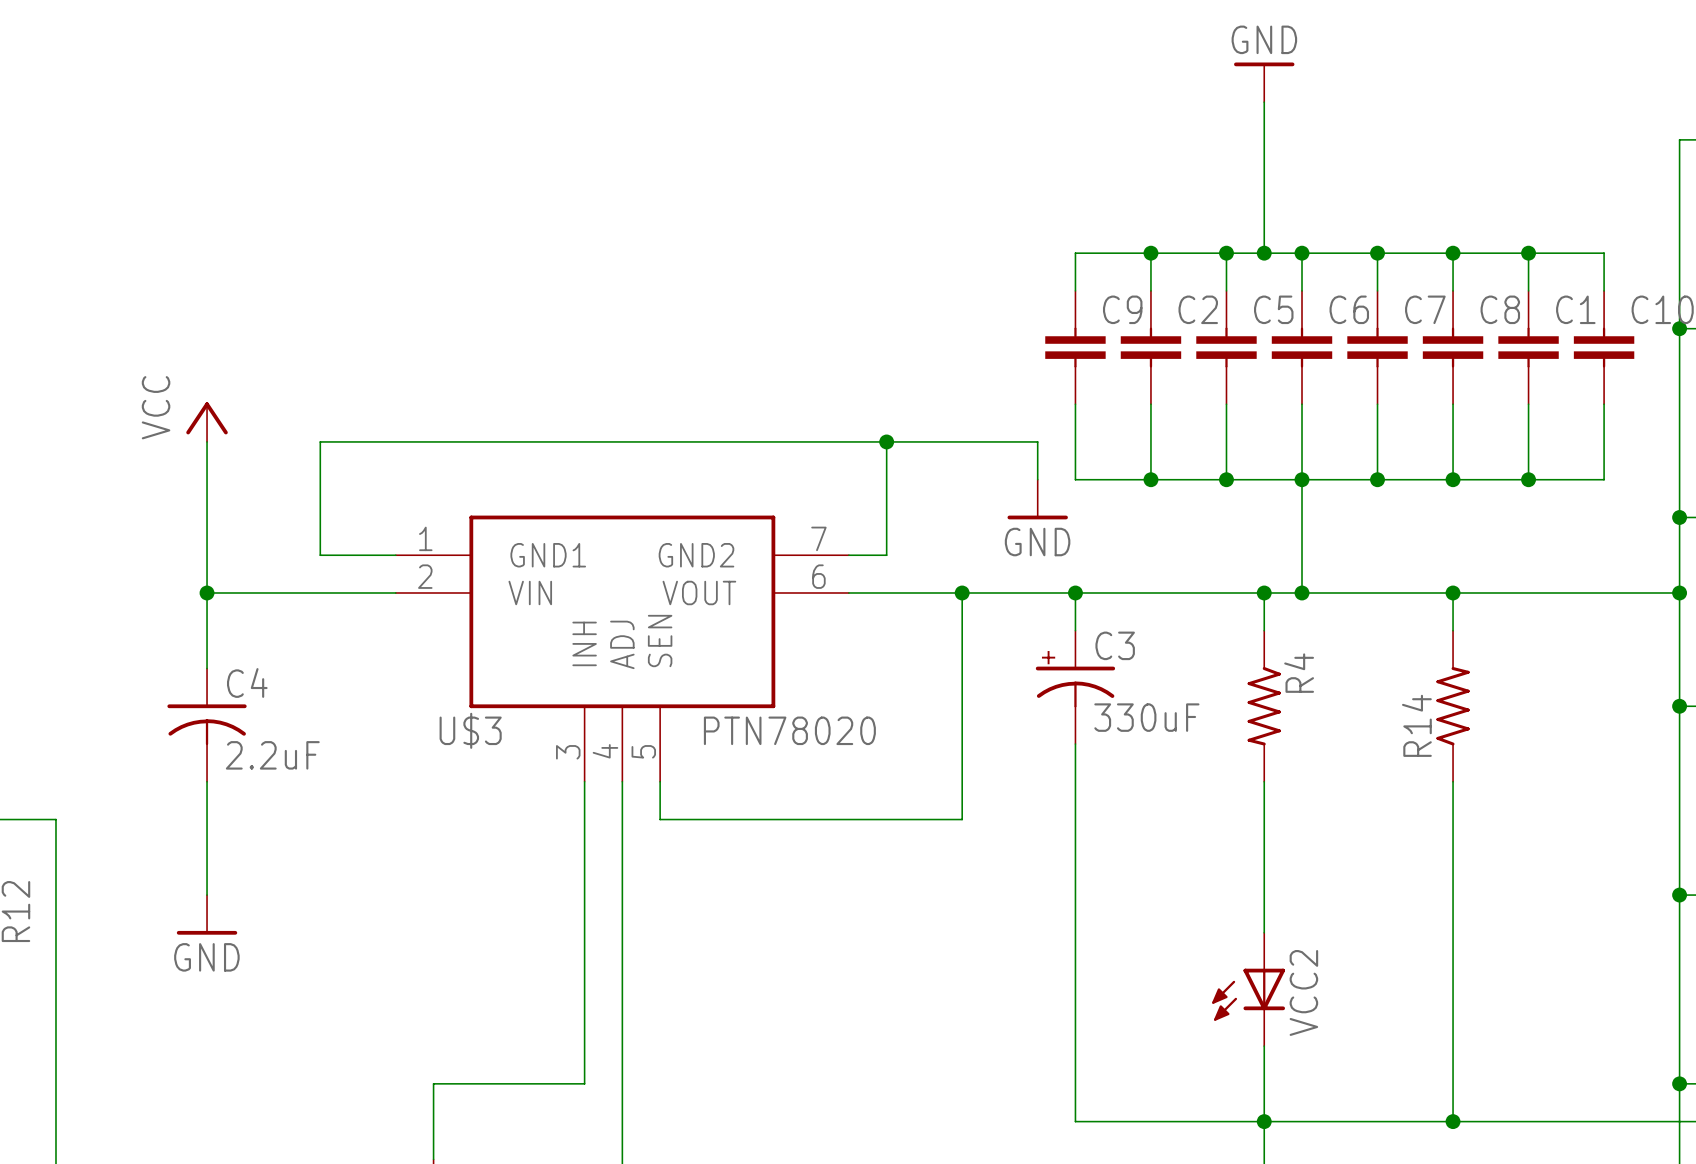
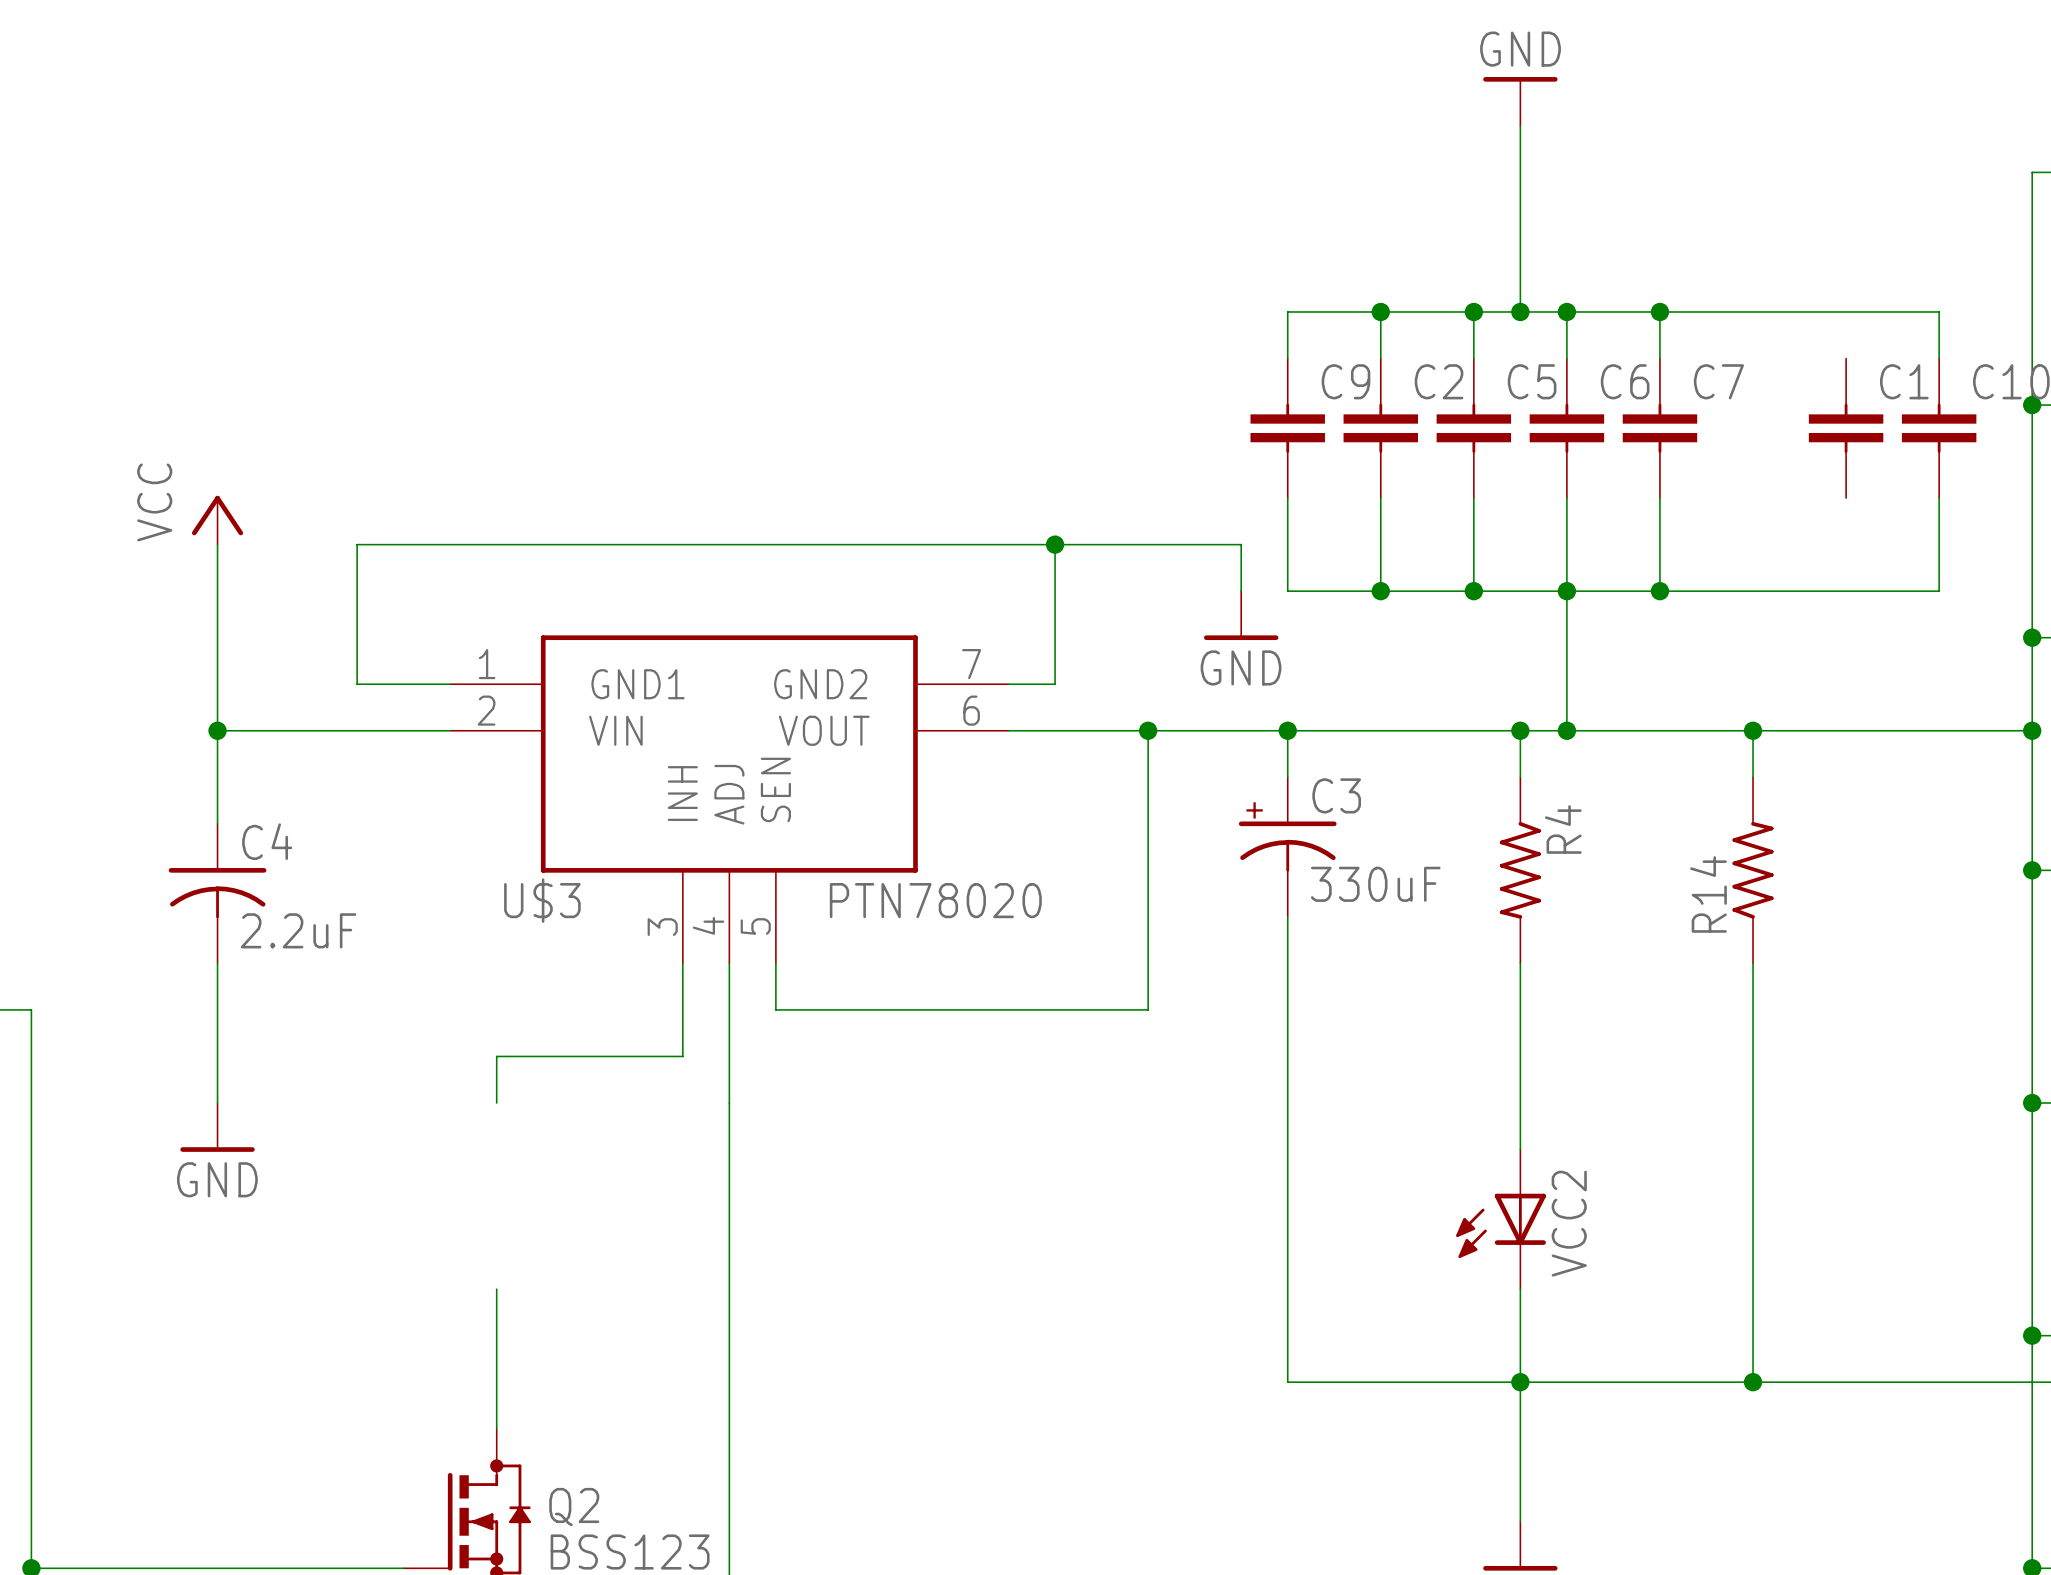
wire: (1453, 253) (1453, 290) -> none
junction: (1453, 253) -> none
wire: (1528, 253) (1528, 290) -> none
junction: (1528, 253) -> none
C8: (1453, 347) -> none
wire: (1453, 404) (1453, 479) -> none
wire: (1528, 404) (1528, 479) -> none
junction: (1453, 479) -> none
junction: (1528, 479) -> none
wire: (584, 857) (584, 1083) (433, 1083) -> (682, 1056) (496, 1056) (496, 1103)
wire: none -> (496, 1289) (496, 1335)

